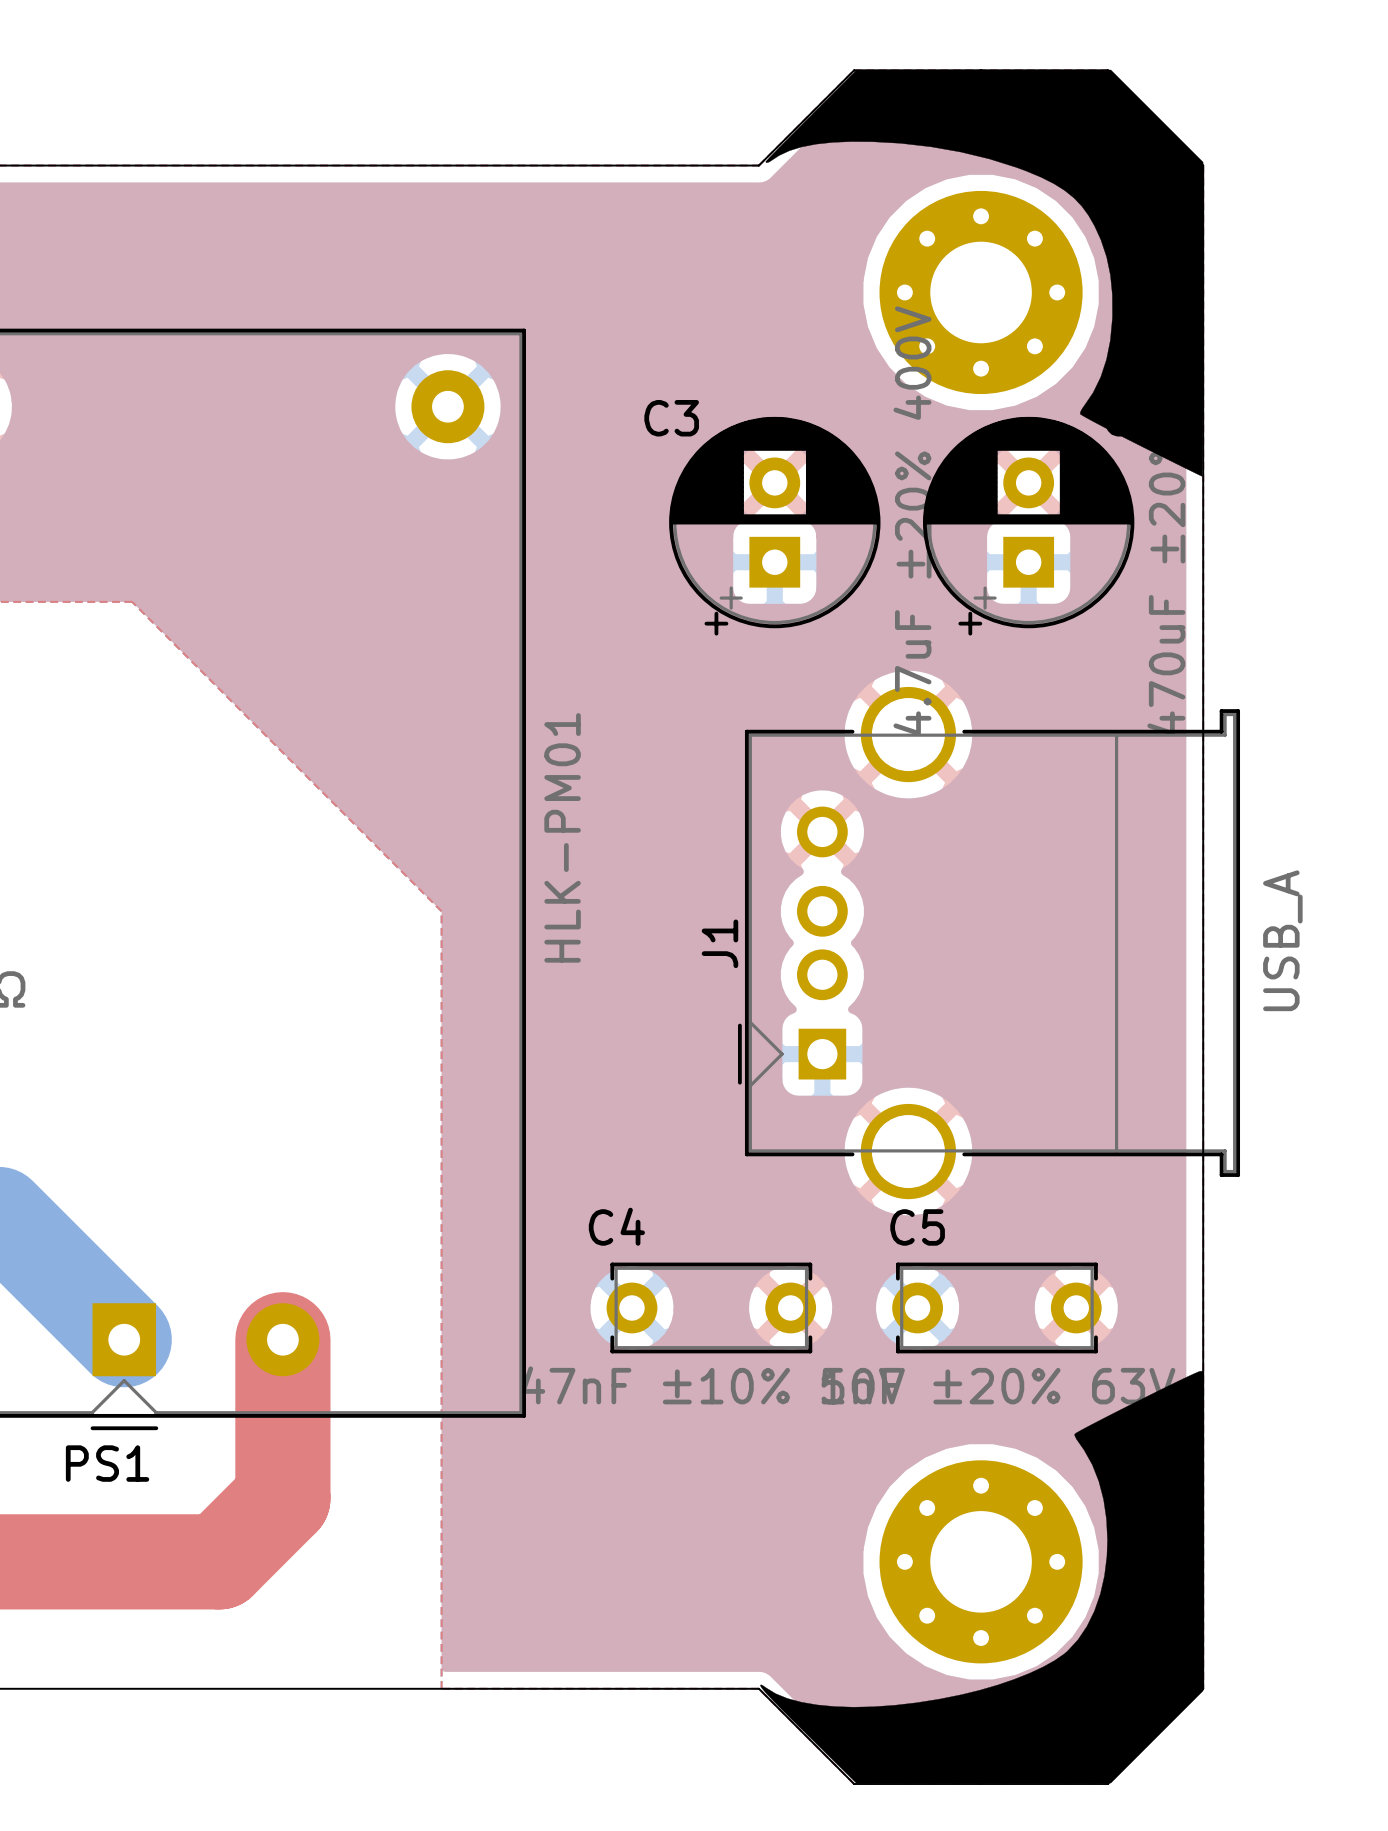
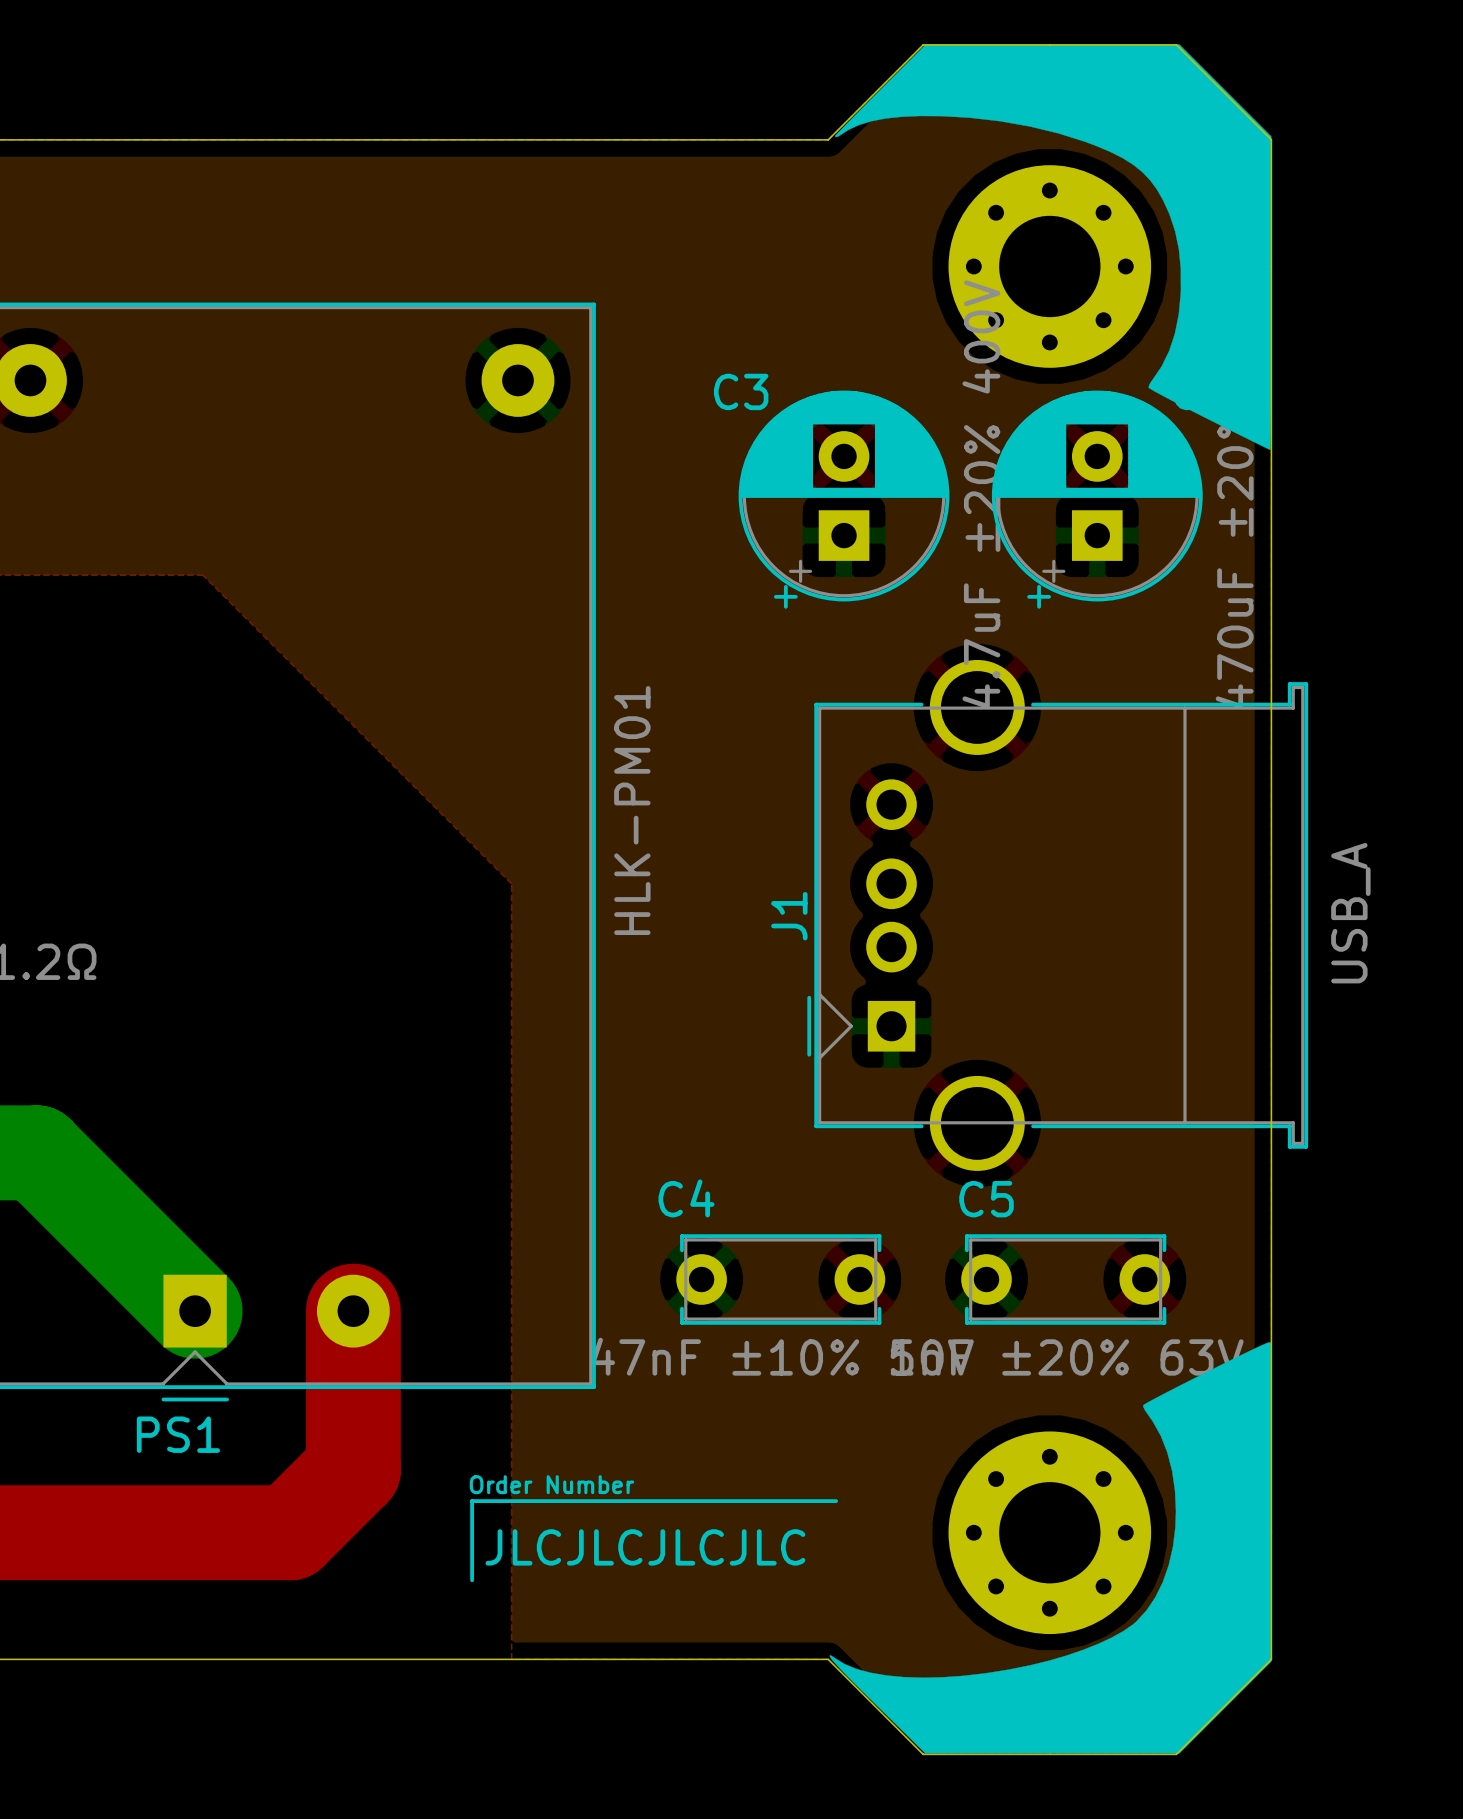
text: none -> Order Number (551, 1484)
line: none -> (836, 1501) (472, 1501) (472, 1580)
text: none -> JLCJLCJLCJLC (645, 1547)

